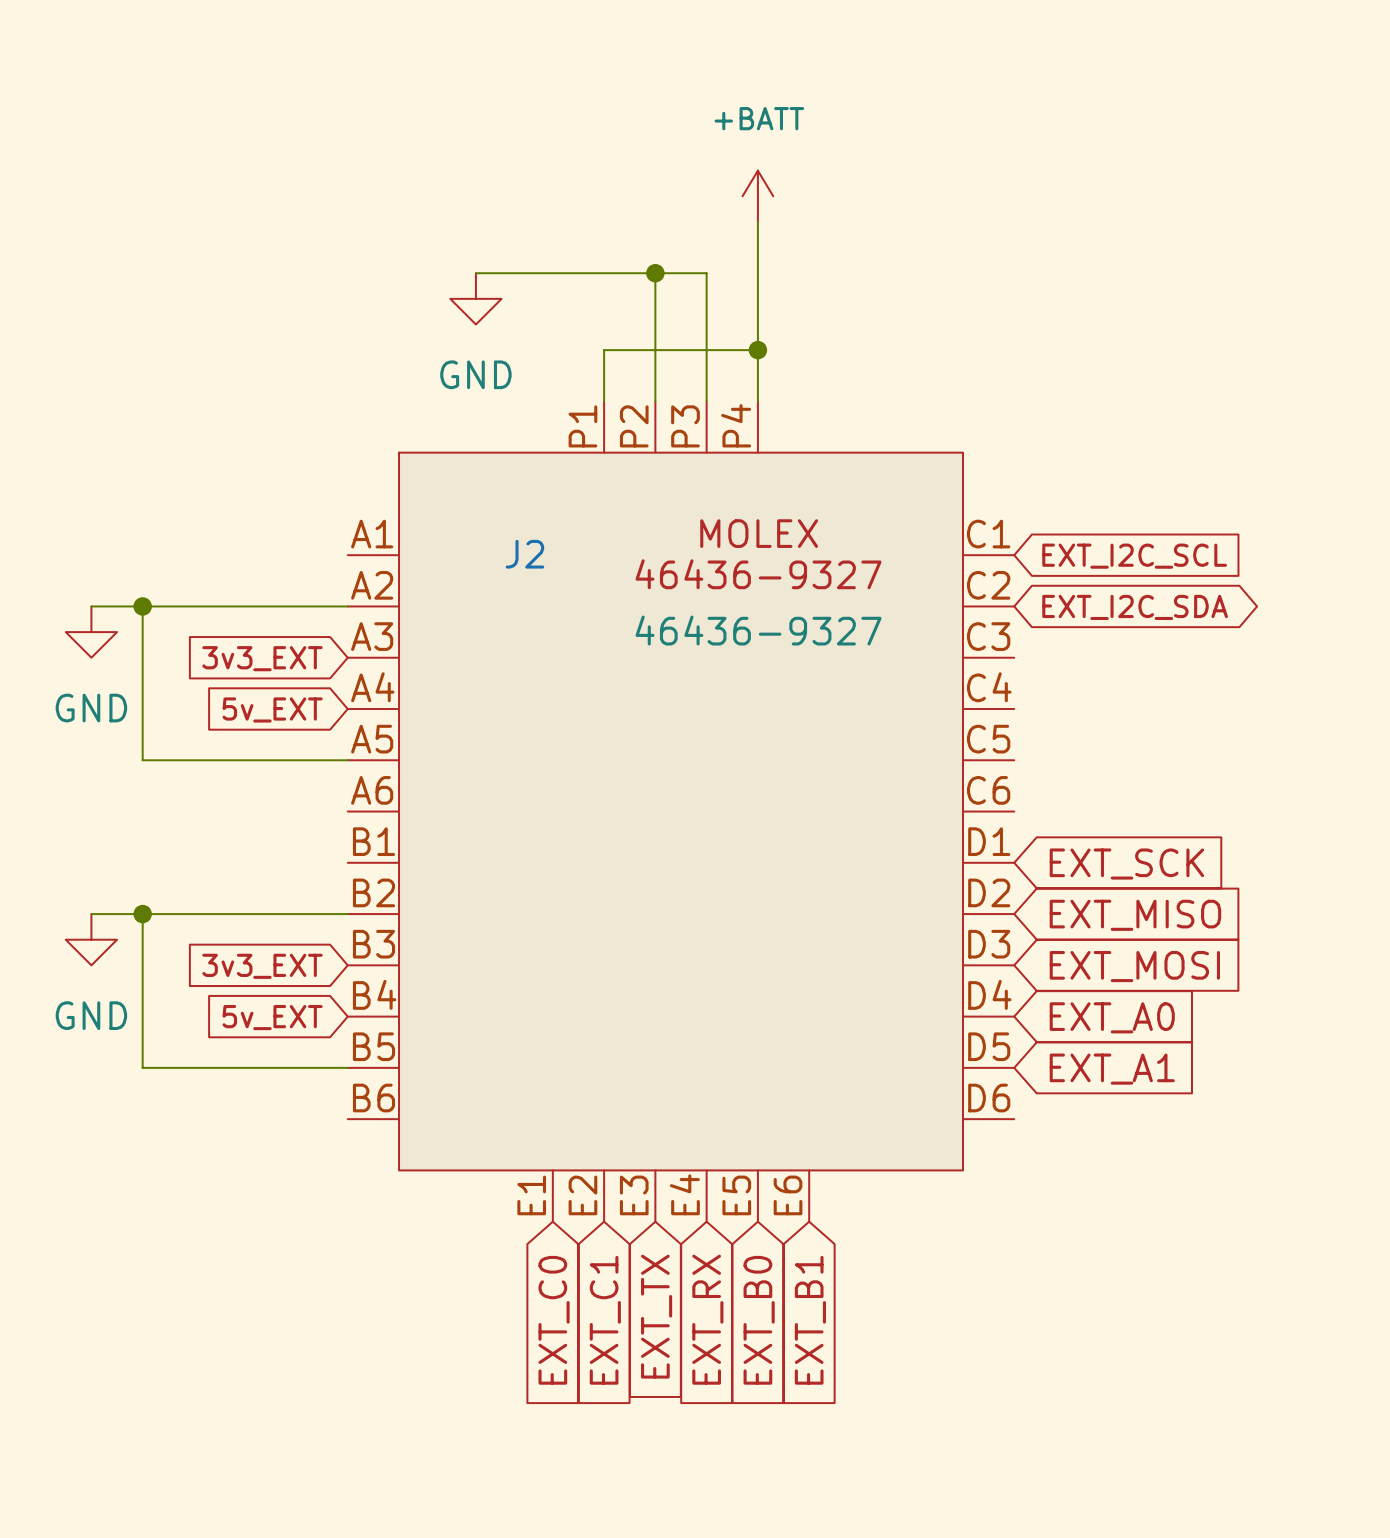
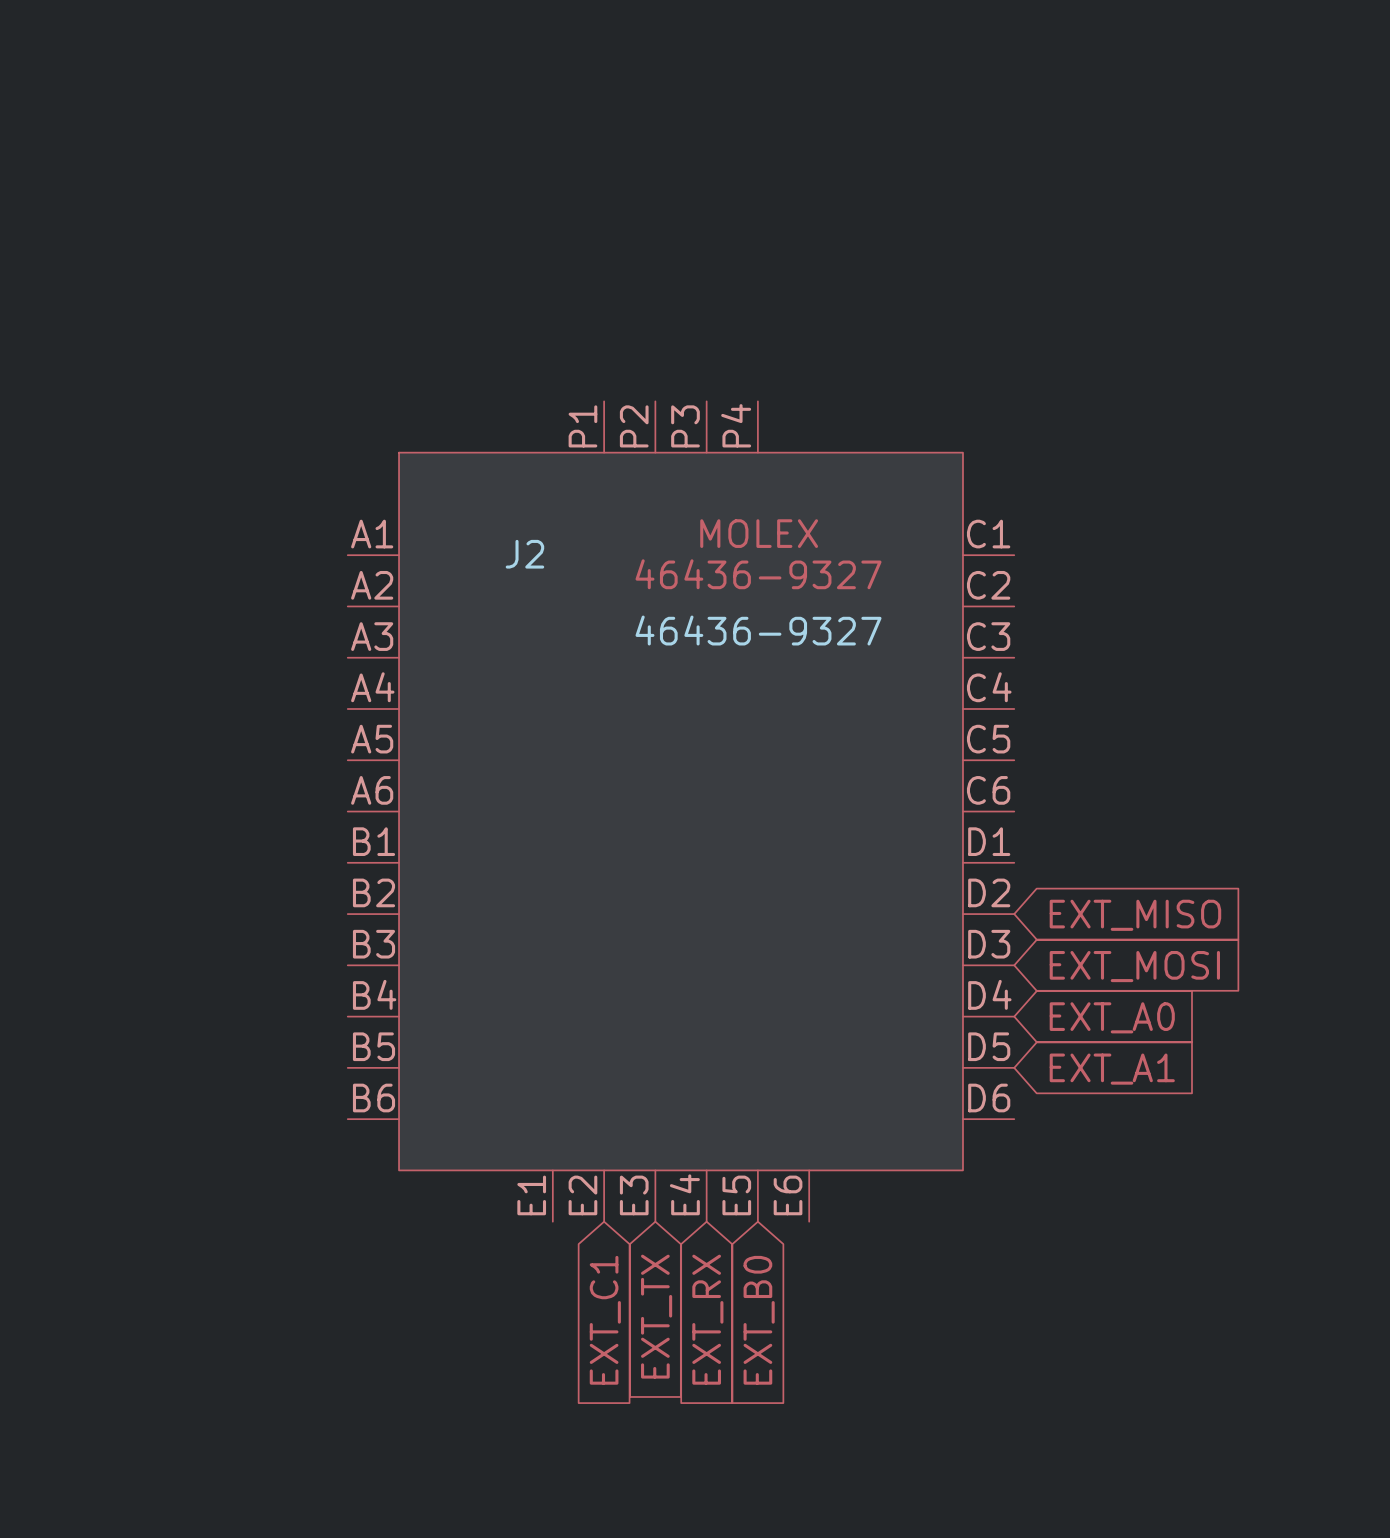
power symbol: +BATT (757, 196) -> none
wire: (757, 221) (757, 401) -> none
wire: (475, 273) (706, 273) (706, 401) -> none
wire: (655, 273) (655, 401) -> none
junction: (655, 273) -> none
power symbol: GND (475, 298) -> none
wire: (757, 350) (604, 350) (604, 401) -> none
junction: (757, 350) -> none
global label: EXT_I2C_SCL (1134, 556) -> none
wire: (91, 606) (347, 606) -> none
wire: (142, 606) (142, 760) (347, 760) -> none
junction: (142, 606) -> none
global label: EXT_I2C_SDA (1135, 607) -> none
power symbol: GND (91, 632) -> none
global label: 3v3_EXT (262, 658) -> none
global label: 5v_EXT (272, 709) -> none
global label: EXT_SCK (1126, 864) -> none
wire: (91, 914) (347, 914) -> none
wire: (142, 914) (142, 1067) (347, 1067) -> none
junction: (142, 914) -> none
power symbol: GND (91, 939) -> none
global label: 3v3_EXT (262, 966) -> none
global label: 5v_EXT (272, 1017) -> none
global label: EXT_C0 (554, 1320) -> none
global label: EXT_B1 (810, 1320) -> none

